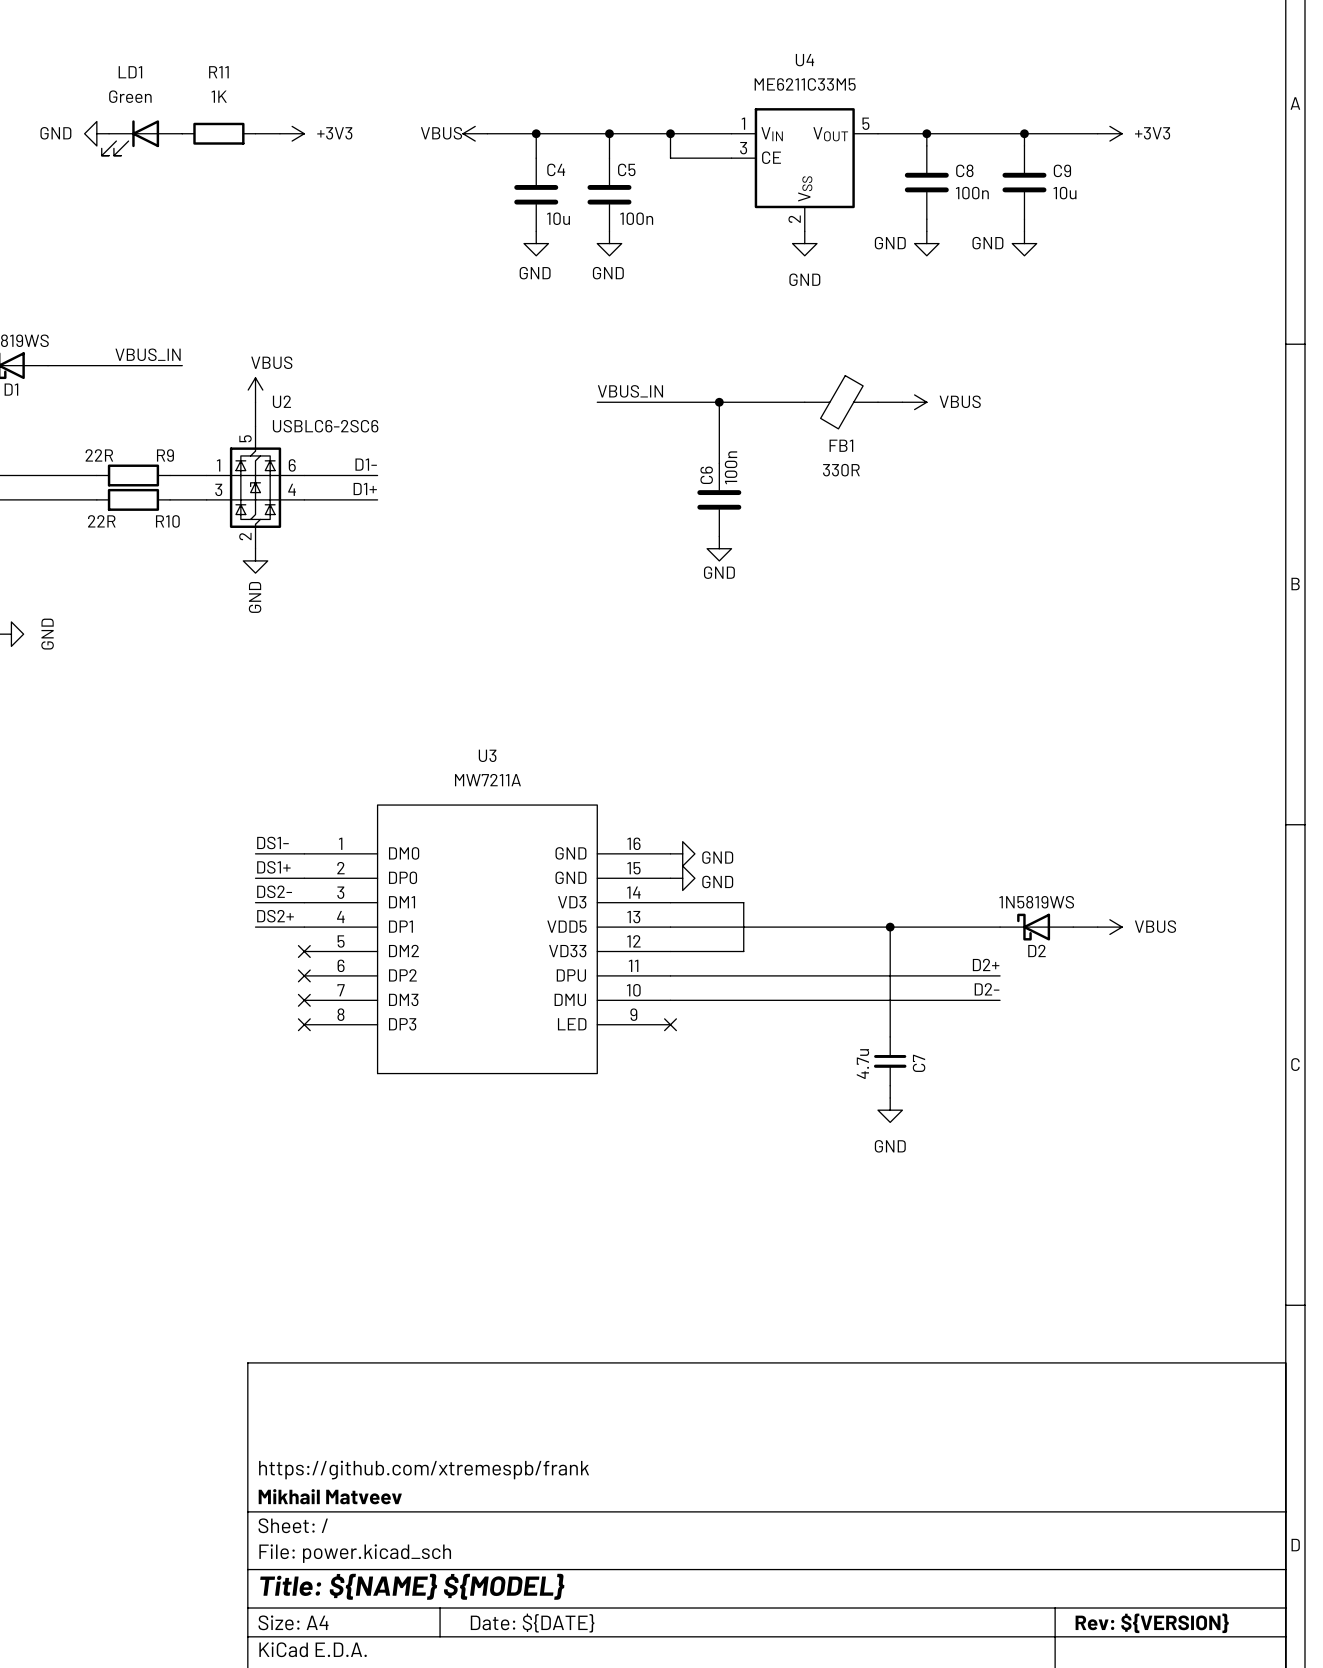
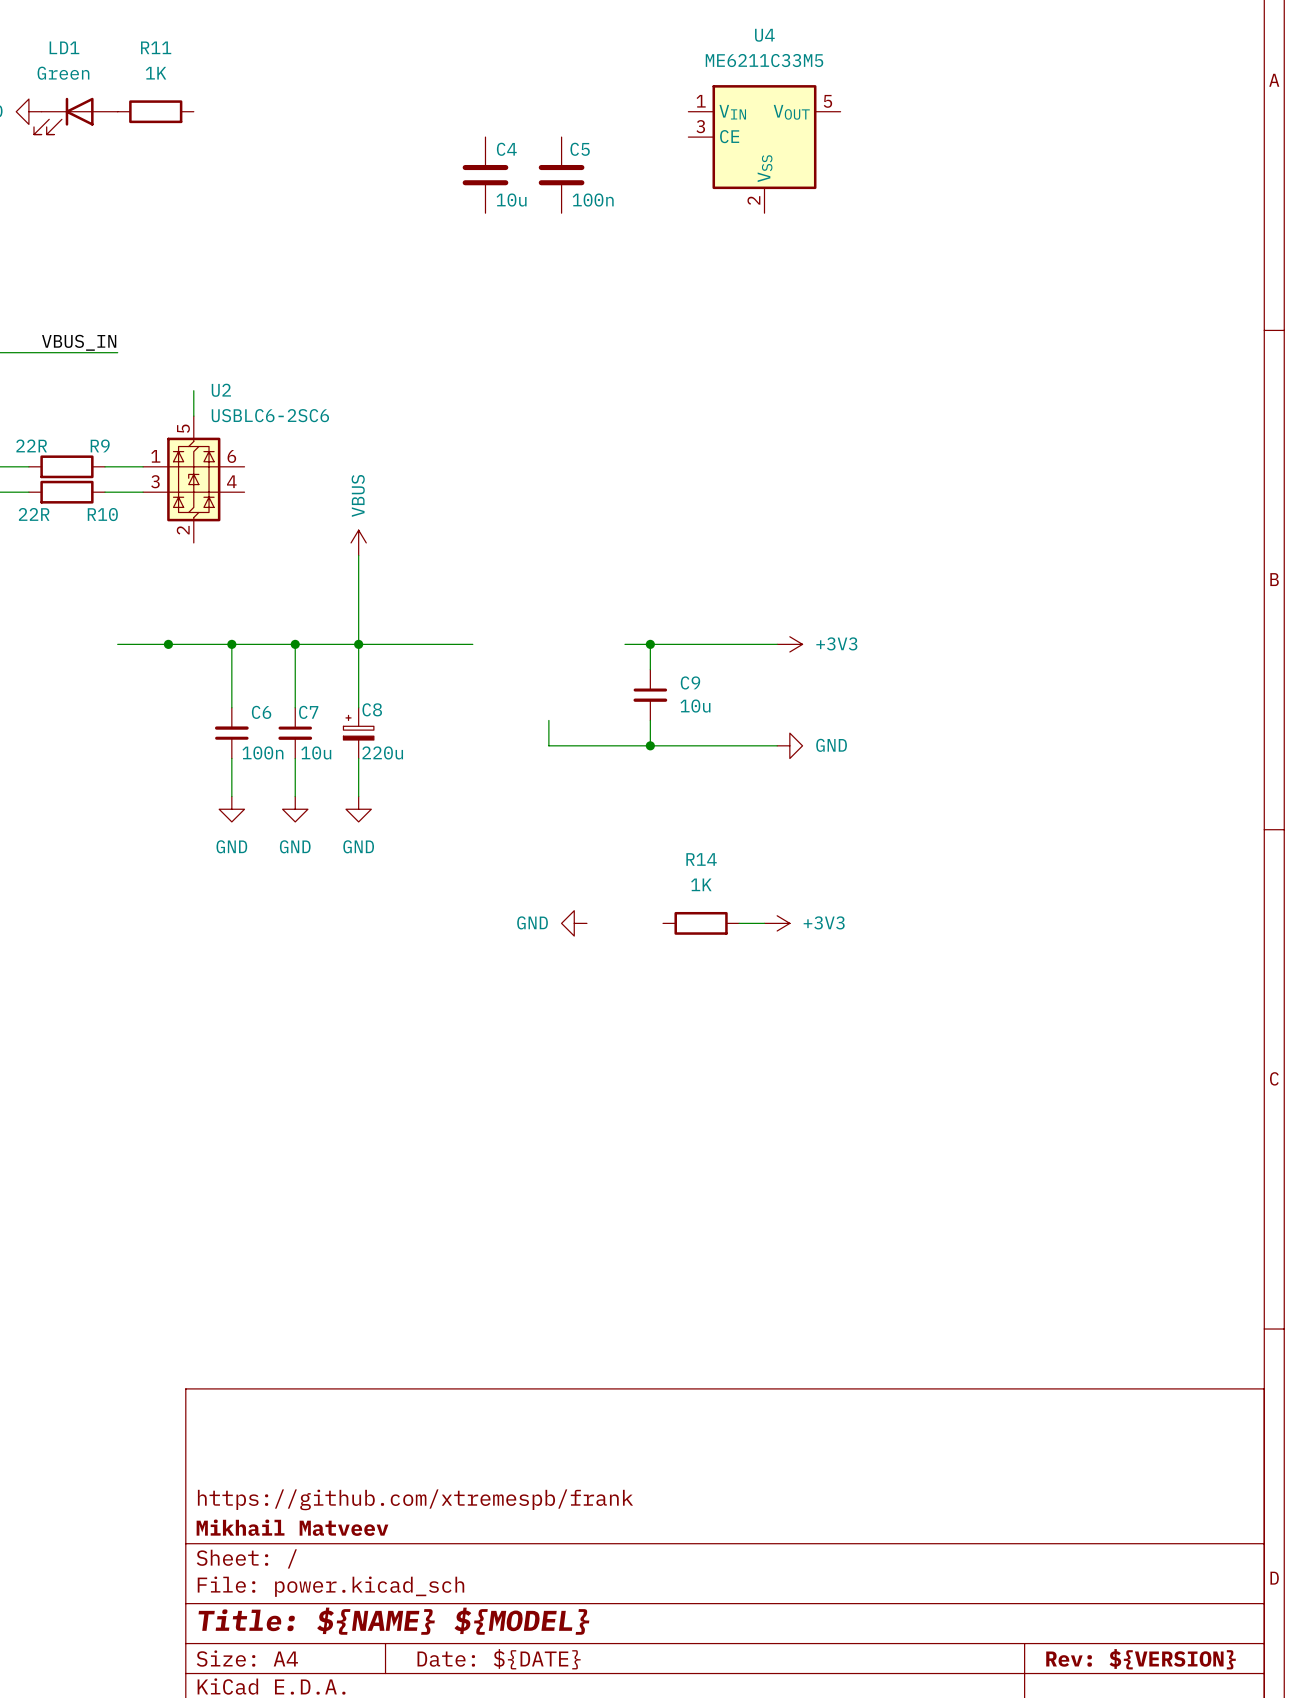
wire: (255, 133) (279, 133) -> none
power symbol: +3V3 (292, 133) -> none
power symbol: VBUS (475, 133) -> none
wire: (487, 133) (731, 133) -> none
wire: (536, 133) (536, 158) -> none
junction: (536, 133) -> none
wire: (609, 133) (609, 158) -> none
junction: (609, 133) -> none
wire: (670, 133) (670, 158) (731, 158) -> none
junction: (670, 133) -> none
wire: (878, 133) (1097, 133) -> none
wire: (926, 133) (926, 145) -> none
junction: (926, 133) -> none
wire: (1024, 133) (1024, 145) -> none
junction: (1024, 133) -> none
power symbol: +3V3 (1109, 133) -> none
C8 symbol: [904, 145, 949, 220] -> [343, 707, 374, 759]
C9 symbol: [1002, 145, 1047, 220] -> [633, 669, 668, 721]
C8 name position: C8 (964, 170) -> C8 (372, 709)
C8 value: 100n (972, 193) -> 220u (382, 752)
wire: (926, 219) (926, 231) -> none
wire: (1024, 219) (1024, 231) -> none
power symbol: GND (536, 243) -> none
power symbol: GND (609, 243) -> none
power symbol: GND (804, 243) -> none
power symbol: GND (926, 243) -> none
power symbol: GND (1024, 243) -> none
power symbol: VBUS (255, 390) -> none
label: VBUS_IN (630, 391) -> none
wire: (597, 402) (804, 402) -> none
wire: (719, 402) (719, 463) -> none
junction: (719, 402) -> none
FB1: 330R (841, 402) -> none
wire: (878, 402) (902, 402) -> none
power symbol: VBUS (914, 402) -> none
C6 symbol: [697, 463, 742, 537] -> [214, 707, 249, 759]
label: D1- (366, 464) -> none
C6 value position: 100n (731, 467) -> 100n (262, 752)
wire: (304, 475) (377, 475) -> none
C6 name position: C6 (706, 475) -> C6 (261, 712)
label: D1+ (365, 489) -> none
wire: (304, 499) (377, 499) -> none
power symbol: none -> VBUS (358, 542)
power symbol: GND (719, 548) -> none
power symbol: GND (255, 560) -> none
wire: none -> (358, 555) (358, 707)
wire: none -> (117, 644) (472, 644)
junction: none -> (168, 644)
wire: none -> (231, 644) (231, 707)
junction: none -> (231, 644)
wire: none -> (295, 644) (295, 707)
junction: none -> (295, 644)
junction: none -> (358, 644)
wire: none -> (624, 644) (777, 644)
wire: none -> (650, 644) (650, 669)
junction: none -> (650, 644)
power symbol: none -> +3V3 (789, 644)
wire: none -> (548, 720) (548, 745) (777, 745)
wire: none -> (650, 720) (650, 745)
junction: none -> (650, 745)
power symbol: none -> GND (789, 745)
wire: none -> (231, 758) (231, 796)
wire: none -> (295, 758) (295, 796)
wire: none -> (358, 758) (358, 796)
power symbol: none -> GND (231, 809)
power symbol: none -> GND (295, 809)
power symbol: none -> GND (358, 809)
label: DS1- (272, 842) -> none
wire: (255, 853) (304, 853) -> none
power symbol: GND (682, 853) -> none
label: DS1+ (273, 867) -> none
wire: (255, 878) (304, 878) -> none
power symbol: GND (682, 878) -> none
label: DS2- (274, 891) -> none
wire: (255, 902) (304, 902) -> none
wire: (670, 902) (743, 902) (743, 951) (670, 951) -> none
power symbol: none -> GND (574, 923)
R14: none -> 1K (701, 923)
wire: none -> (739, 923) (764, 923)
power symbol: none -> +3V3 (777, 923)
label: DS2+ (275, 916) -> none
wire: (255, 927) (304, 927) -> none
wire: (670, 927) (1000, 927) -> none
wire: (890, 927) (890, 1036) -> none
junction: (890, 927) -> none
D2: 1N5819WS (1036, 927) -> none
wire: (1073, 927) (1097, 927) -> none
power symbol: VBUS (1109, 927) -> none
U3: MW7211A (487, 939) -> none
no-connect mark: (304, 951) -> none
label: D2+ (986, 964) -> none
no-connect mark: (304, 975) -> none
wire: (670, 975) (1000, 975) -> none
label: D2- (987, 989) -> none
no-connect mark: (304, 1000) -> none
wire: (670, 1000) (1000, 1000) -> none
no-connect mark: (304, 1024) -> none
no-connect mark: (670, 1024) -> none
C7 position: (890, 1061) -> (295, 733)
C7 name rotation: 0° (919, 1063) -> 90° clockwise (308, 712)
C7 value: 4.7u (862, 1064) -> 10u (316, 752)
wire: (890, 1085) (890, 1097) -> none
power symbol: GND (890, 1110) -> none

